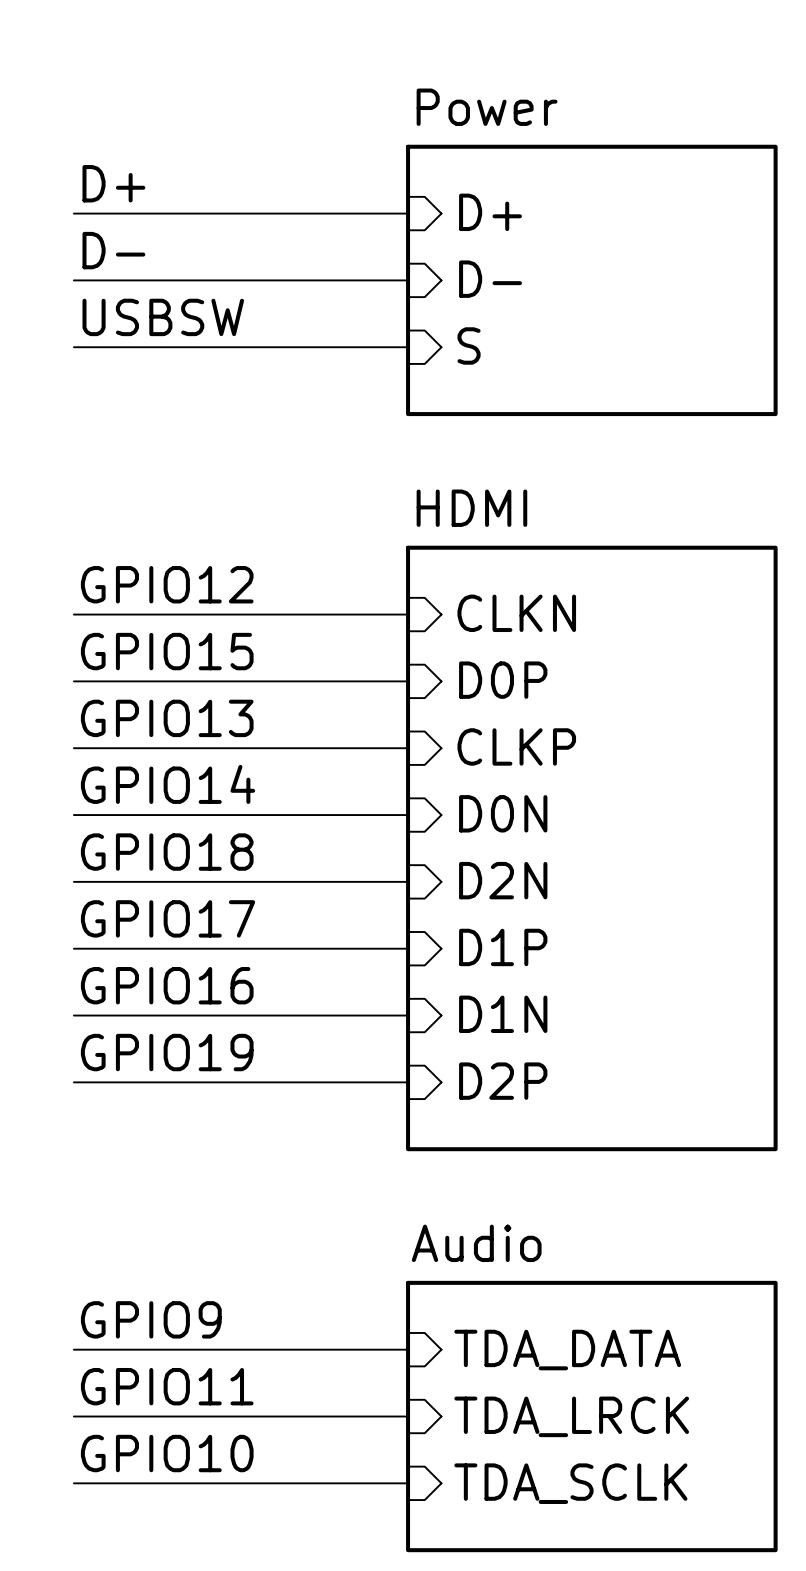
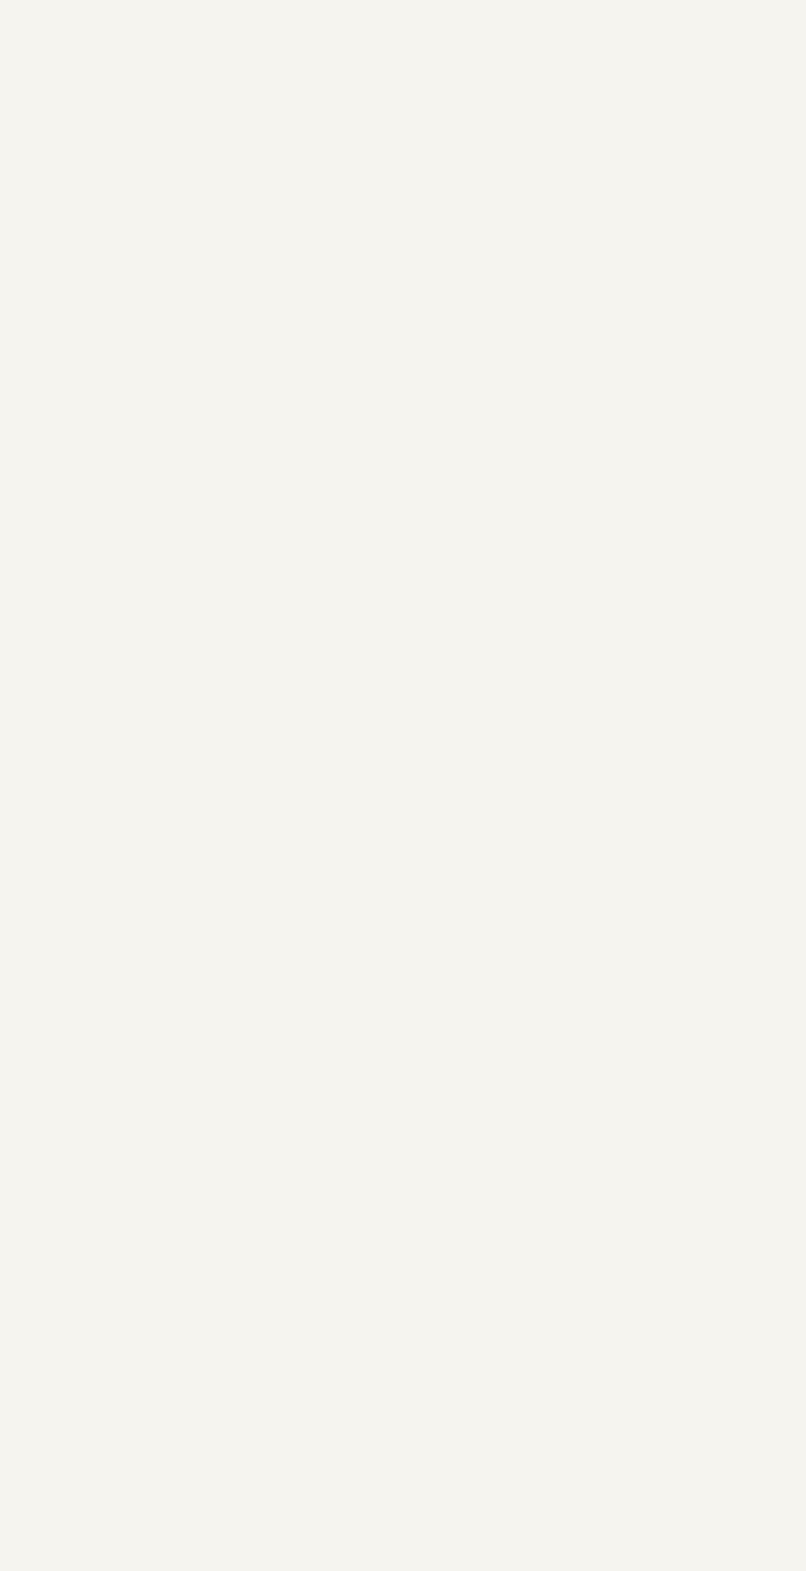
label: D+ (113, 183) -> none
sheet pin: D+ (490, 212) -> none
wire: (73, 213) (408, 213) -> none
label: D- (113, 250) -> none
sheet pin: D- (490, 279) -> none
wire: (73, 280) (408, 280) -> none
sheet Power: (591, 280) -> none
label: USBSW (163, 317) -> none
sheet pin: S (469, 345) -> none
wire: (73, 347) (408, 347) -> none
label: GPIO12 (167, 584) -> none
sheet pin: CLKN (516, 613) -> none
wire: (73, 614) (408, 614) -> none
label: GPIO15 (167, 651) -> none
sheet pin: D0P (503, 680) -> none
wire: (73, 681) (408, 681) -> none
label: GPIO13 (167, 718) -> none
sheet pin: CLKP (516, 746) -> none
wire: (73, 748) (408, 748) -> none
label: GPIO14 (168, 784) -> none
sheet pin: D0N (503, 813) -> none
wire: (73, 815) (408, 815) -> none
sheet HDMI: (591, 848) -> none
label: GPIO18 (167, 852) -> none
sheet pin: D2N (503, 880) -> none
wire: (73, 881) (408, 881) -> none
label: GPIO17 (168, 918) -> none
sheet pin: D1P (503, 947) -> none
wire: (73, 948) (408, 948) -> none
label: GPIO16 (167, 985) -> none
sheet pin: D1N (503, 1014) -> none
wire: (73, 1015) (408, 1015) -> none
label: GPIO19 (167, 1052) -> none
sheet pin: D2P (503, 1081) -> none
wire: (73, 1082) (408, 1082) -> none
label: GPIO9 (151, 1319) -> none
wire: (73, 1349) (408, 1349) -> none
sheet pin: TDA_DATA (567, 1350) -> none
label: GPIO11 (167, 1386) -> none
wire: (73, 1416) (408, 1416) -> none
sheet pin: TDA_LRCK (571, 1416) -> none
sheet Audio: (591, 1416) -> none
label: GPIO10 (167, 1453) -> none
wire: (73, 1483) (408, 1483) -> none
sheet pin: TDA_SCLK (570, 1483) -> none

